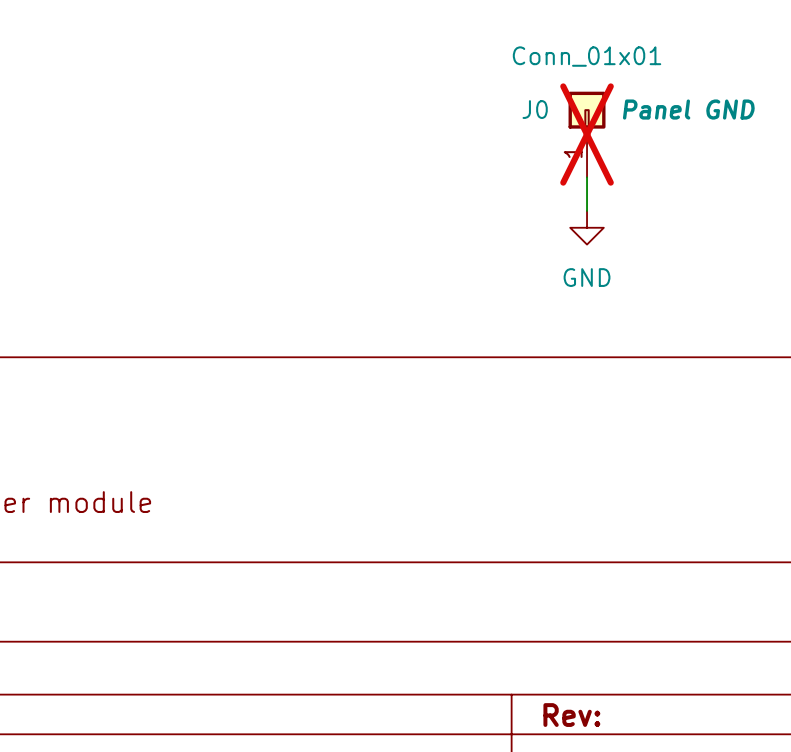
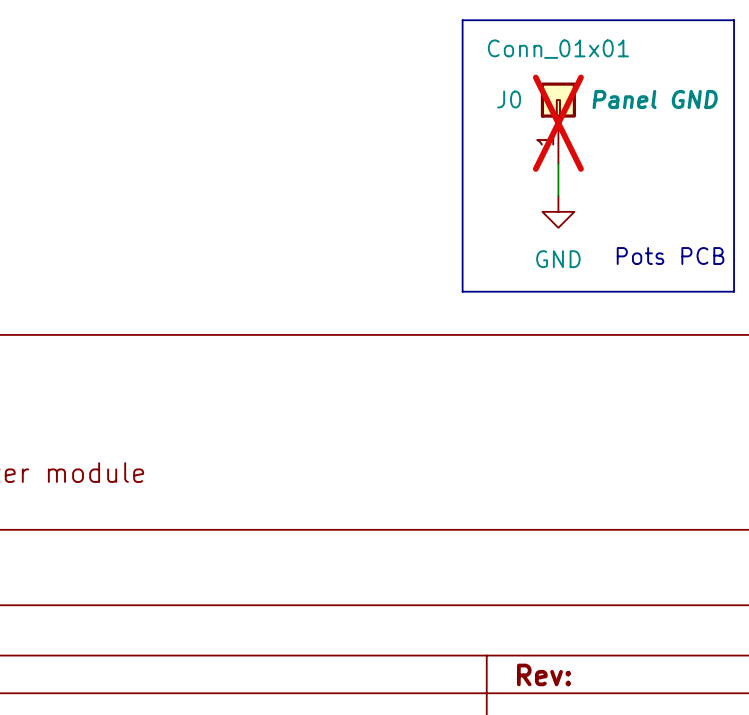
line: none -> (462, 20) (734, 20) (734, 291) (462, 291) (462, 20)
text: none -> Pots PCB (670, 256)

